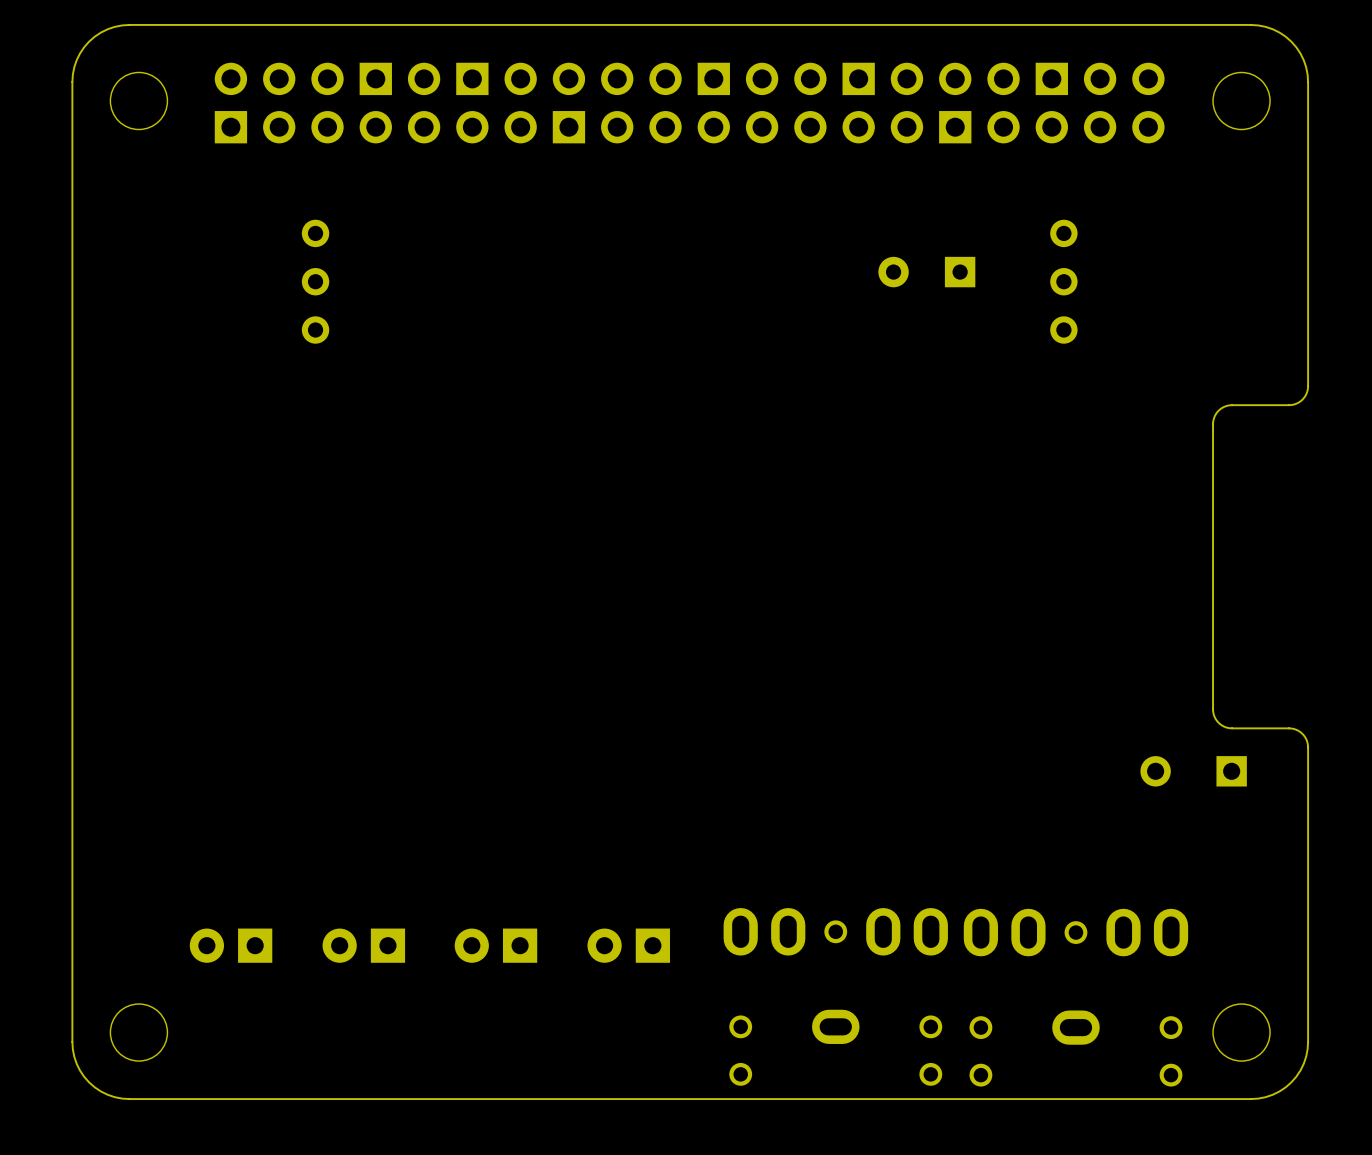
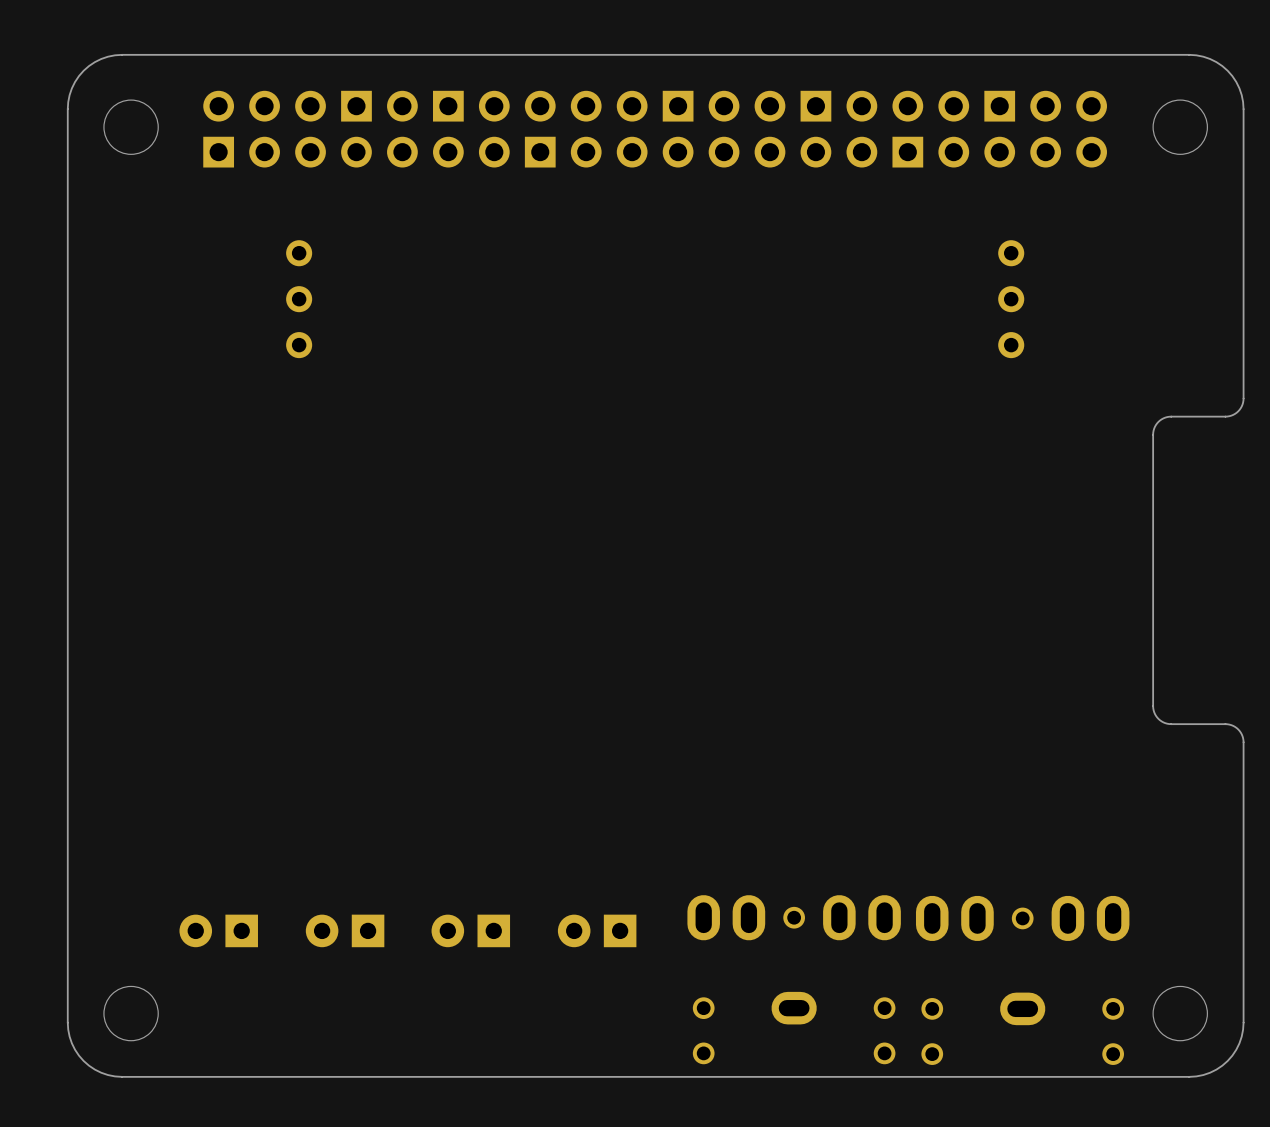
part: (926, 272) -> none
part: (1193, 771) -> none

